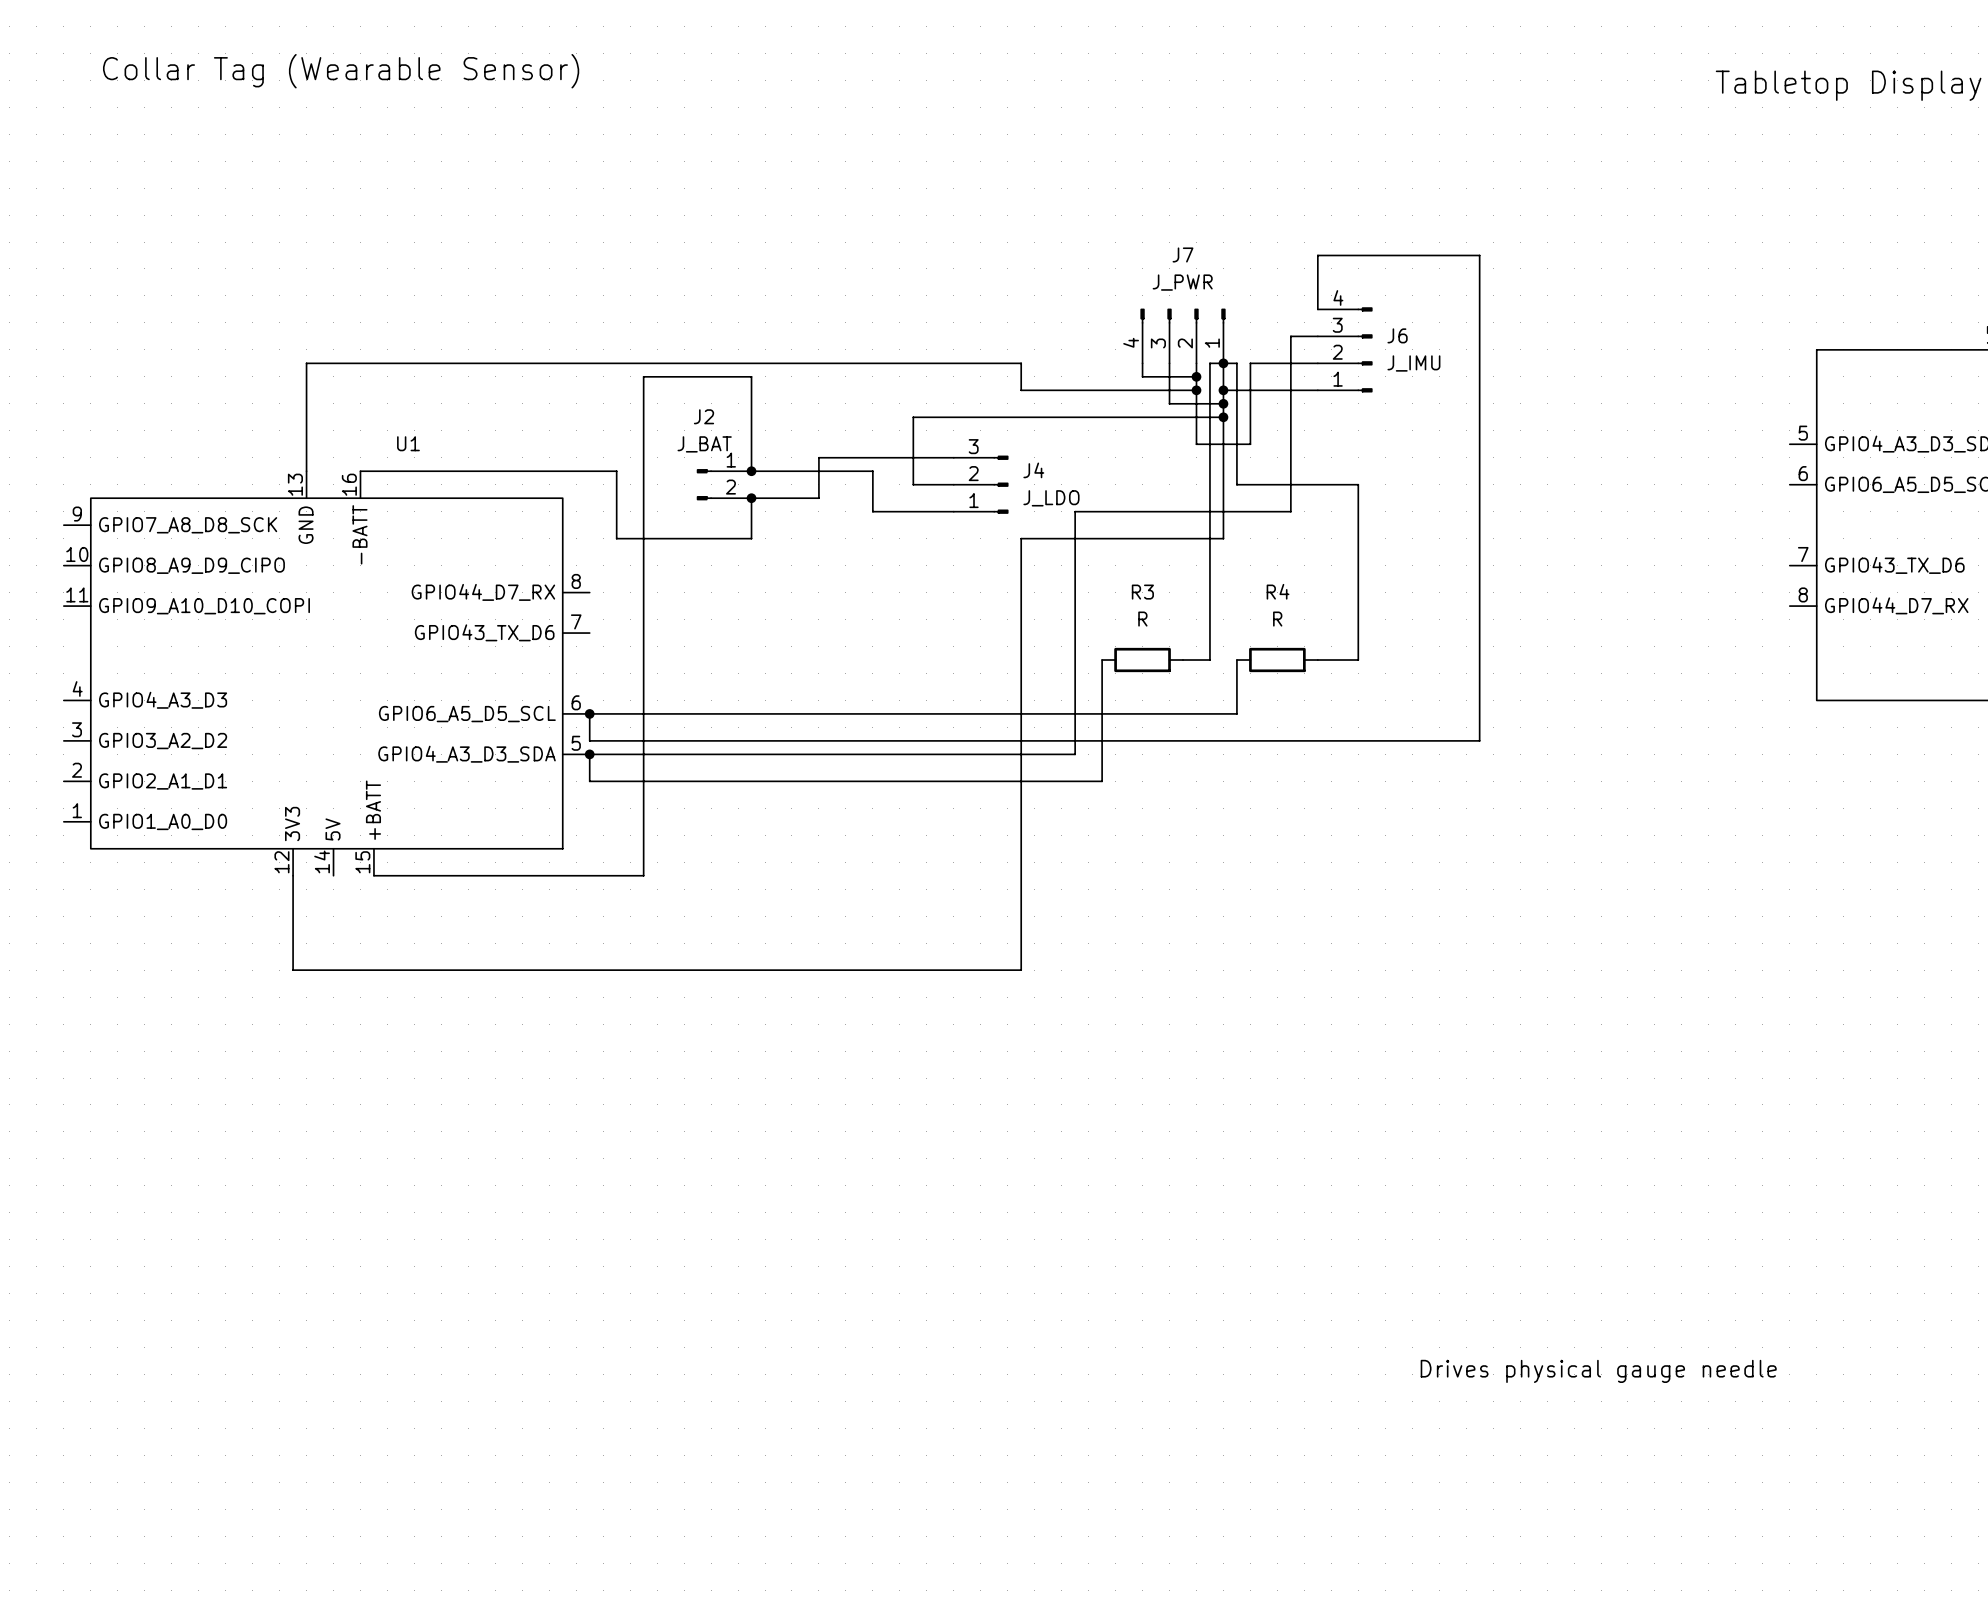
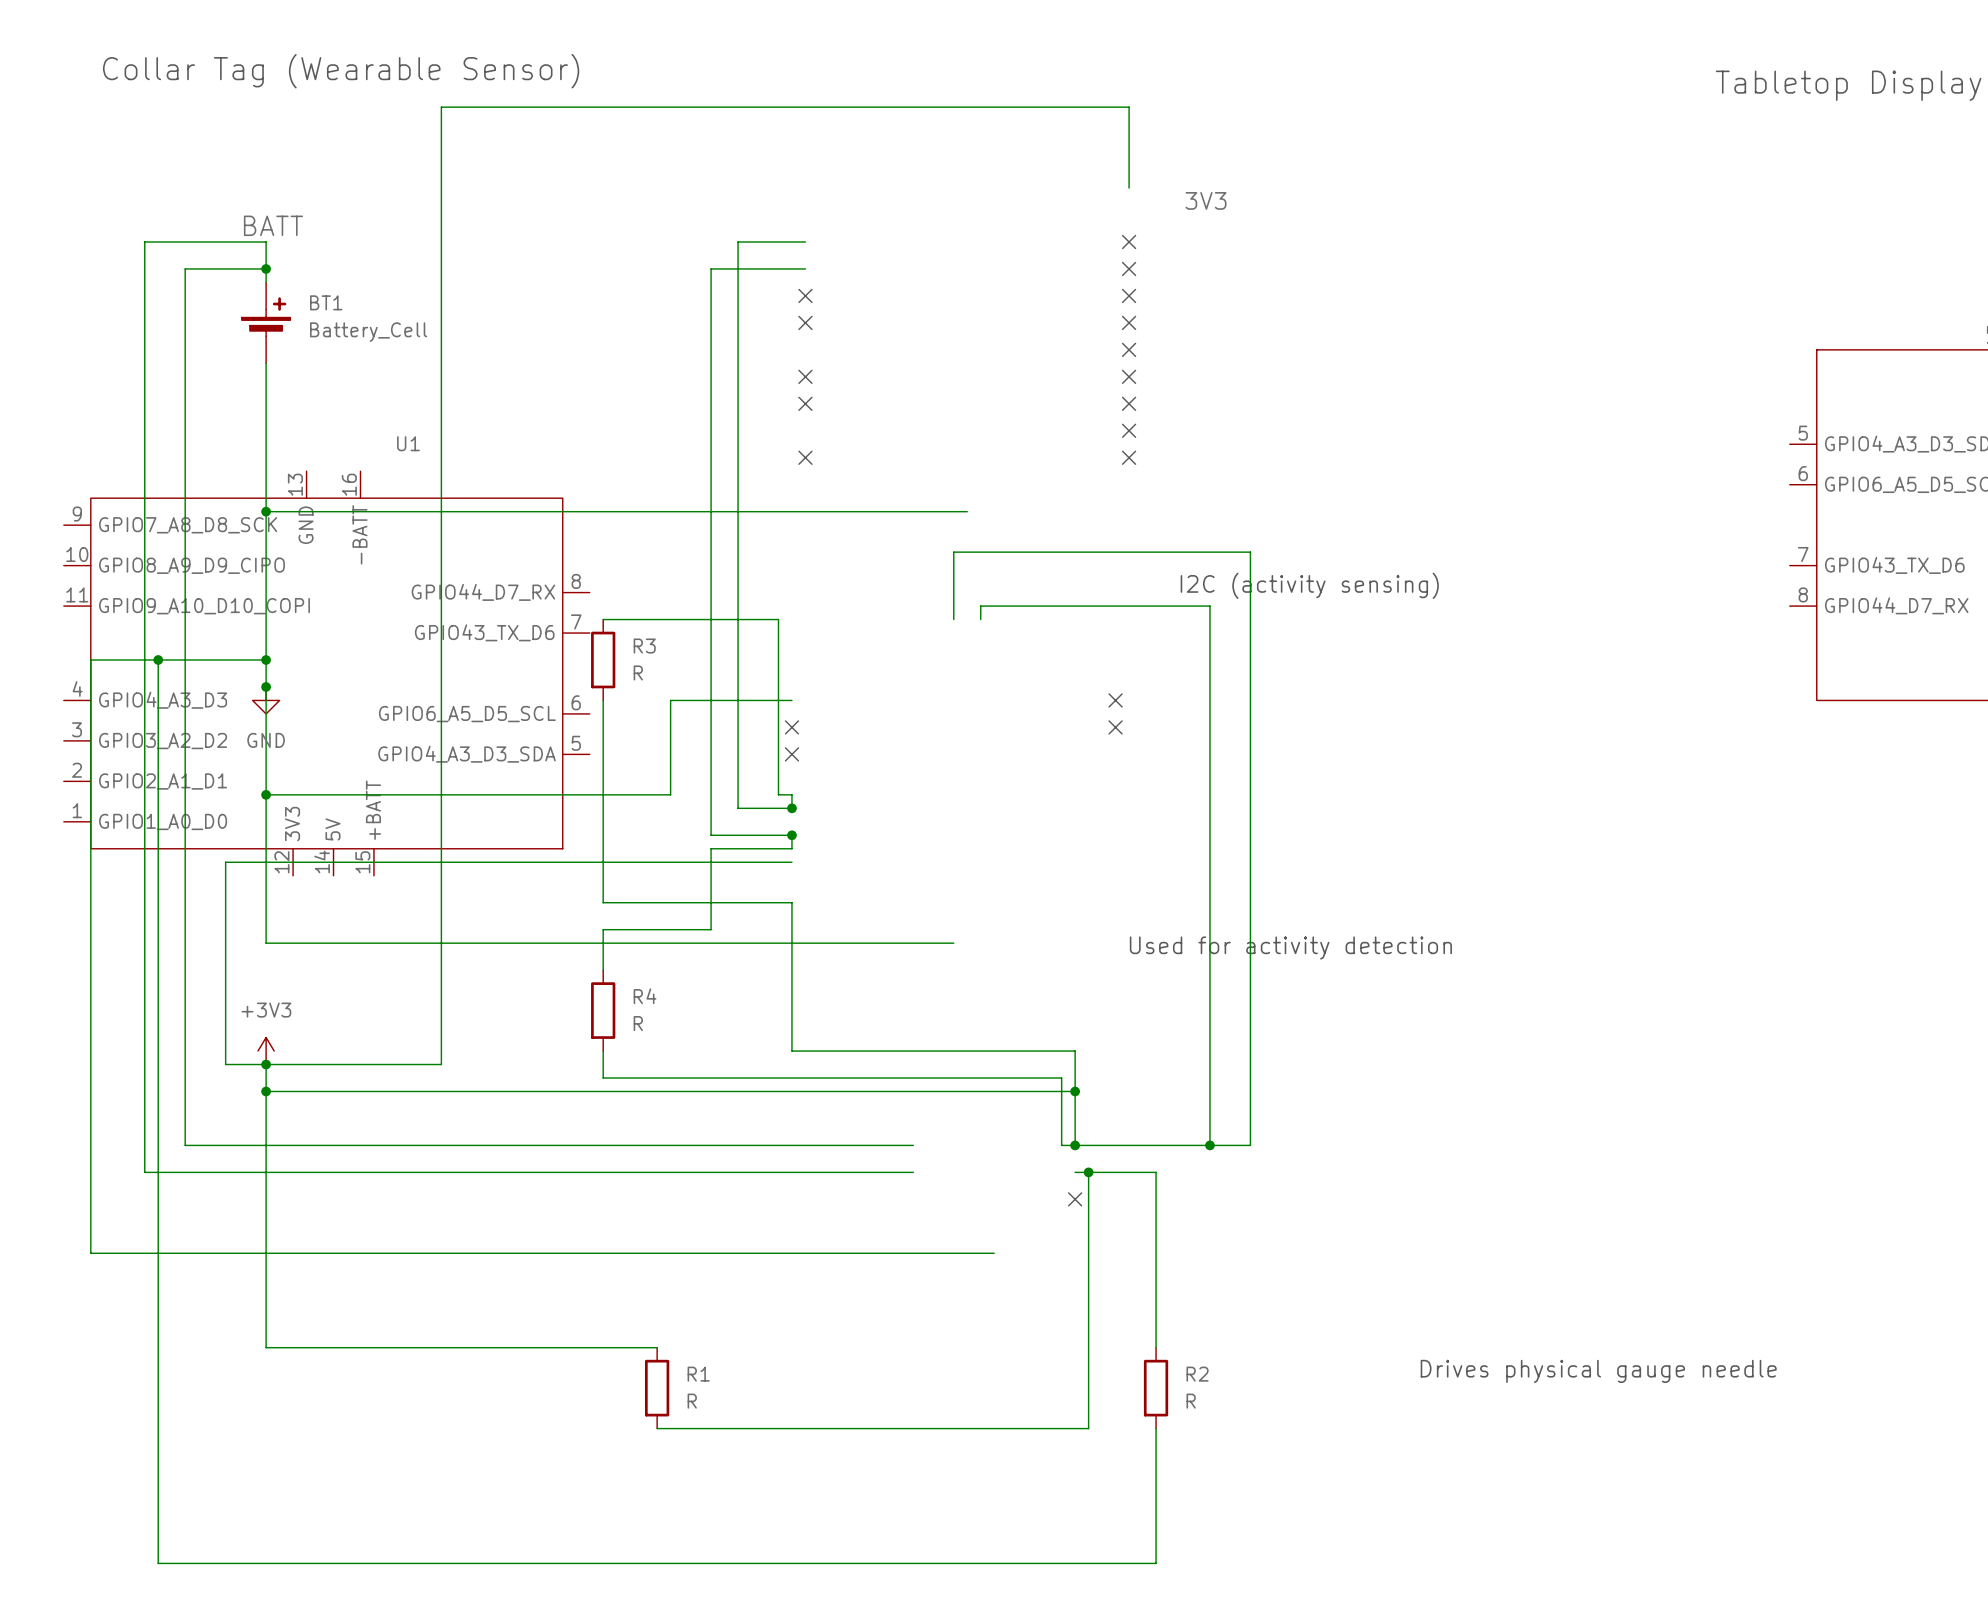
wire: none -> (1129, 188) (1129, 107) (441, 107) (441, 1064) (225, 1064) (225, 862) (791, 862)
label: none -> 3V3 (1206, 200)
label: none -> BATT (273, 225)
wire: none -> (805, 242) (738, 242) (738, 808) (791, 808) (791, 794) (778, 794) (778, 619) (603, 619)
no-connect mark: none -> (1129, 242)
wire: none -> (266, 268) (185, 268) (185, 1145) (913, 1145)
junction: none -> (266, 268)
wire: none -> (805, 268) (711, 268) (711, 835) (791, 835) (791, 848) (711, 848) (711, 929) (603, 929) (603, 970)
no-connect mark: none -> (1129, 268)
wire: none -> (266, 282) (266, 242) (144, 242) (144, 1172) (913, 1172)
no-connect mark: none -> (805, 295)
no-connect mark: none -> (1129, 295)
wire: (1317, 309) (1317, 255) (1479, 255) (1479, 740) (589, 740) (589, 713) (1236, 713) (1236, 660) -> none
BT1: none -> Battery_Cell (266, 322)
no-connect mark: none -> (805, 322)
no-connect mark: none -> (1129, 322)
J7: J_PWR (1183, 335) -> none
wire: (1317, 336) (1290, 336) (1290, 511) (1075, 511) (1075, 754) (589, 754) (589, 781) (1102, 781) (1102, 660) -> none
no-connect mark: none -> (1129, 349)
J6: J_IMU (1345, 349) -> none
wire: none -> (266, 363) (266, 943) (953, 943)
wire: (1142, 363) (1142, 376) (1196, 376) -> none
wire: (1169, 363) (1169, 403) (1223, 403) -> none
wire: (1196, 363) (1196, 444) (1250, 444) (1250, 363) (1317, 363) -> none
wire: (1223, 363) (1223, 538) (1021, 538) (1021, 970) (293, 970) (293, 875) -> none
junction: (1223, 363) -> none
no-connect mark: none -> (805, 376)
no-connect mark: none -> (1129, 376)
junction: (1196, 376) -> none
wire: (1196, 390) (1021, 390) (1021, 363) (306, 363) (306, 471) -> none
junction: (1196, 390) -> none
wire: (1223, 390) (1317, 390) -> none
junction: (1223, 390) -> none
no-connect mark: none -> (805, 403)
no-connect mark: none -> (1129, 403)
junction: (1223, 403) -> none
wire: (1223, 417) (913, 417) (913, 484) (953, 484) -> none
junction: (1223, 417) -> none
no-connect mark: none -> (1129, 430)
no-connect mark: none -> (805, 457)
wire: (953, 457) (818, 457) (818, 498) (751, 498) (751, 538) (616, 538) (616, 471) (360, 471) -> none
no-connect mark: none -> (1129, 457)
junction: (751, 471) -> none
J2: J_BAT (724, 484) -> none
J4: J_LDO (981, 484) -> none
junction: (751, 498) -> none
junction: none -> (266, 511)
wire: (872, 511) (872, 471) (751, 471) (751, 376) (643, 376) (643, 875) (373, 875) -> (872, 511) (266, 511)
text: none -> I2C (activity sensing) (1309, 585)
R4 name position: R4 (1278, 591) -> R4 (645, 996)
R3 name position: R3 (1142, 592) -> R3 (644, 646)
wire: (1209, 606) (1209, 363) (1236, 363) (1236, 484) (1358, 484) (1358, 660) (1317, 660) -> (1209, 606) (980, 606) (980, 619)
wire: none -> (953, 619) (953, 552) (1250, 552) (1250, 1145) (1061, 1145) (1061, 1078) (603, 1078) (603, 1051)
wire: none -> (158, 660) (158, 1563) (1156, 1563) (1156, 1428)
junction: none -> (158, 660)
wire: none -> (266, 660) (90, 660) (90, 1253) (994, 1253)
junction: none -> (266, 660)
R3 rotation: 0° (1142, 660) -> 90° clockwise (603, 660)
R3 position: (1142, 660) -> (603, 660)
wire: (1183, 660) (1209, 660) -> (1209, 1145) (1209, 660)
R4 rotation: 0° (1277, 660) -> 90° clockwise (603, 1010)
R4 position: (1277, 660) -> (603, 1010)
junction: none -> (266, 686)
power symbol: none -> GND (266, 700)
wire: none -> (603, 700) (603, 902) (791, 902) (791, 1051) (1075, 1051) (1075, 1145)
wire: none -> (791, 700) (670, 700) (670, 794) (266, 794)
no-connect mark: none -> (1115, 700)
junction: (589, 713) -> none
no-connect mark: none -> (791, 727)
no-connect mark: none -> (1115, 727)
junction: (589, 754) -> none
no-connect mark: none -> (791, 754)
junction: none -> (266, 794)
junction: none -> (791, 808)
junction: none -> (791, 835)
text: none -> Used for activity detection (1290, 947)
power symbol: none -> +3V3 (266, 1051)
wire: none -> (266, 1064) (266, 1347) (657, 1347)
junction: none -> (266, 1064)
wire: none -> (266, 1091) (1075, 1091)
junction: none -> (266, 1091)
junction: none -> (1075, 1091)
junction: none -> (1075, 1145)
junction: none -> (1209, 1145)
wire: none -> (1075, 1172) (1156, 1172) (1156, 1347)
wire: none -> (1088, 1172) (1088, 1428) (657, 1428)
junction: none -> (1088, 1172)
no-connect mark: none -> (1075, 1199)
R1: none -> R (657, 1388)
R2: none -> R (1156, 1388)

